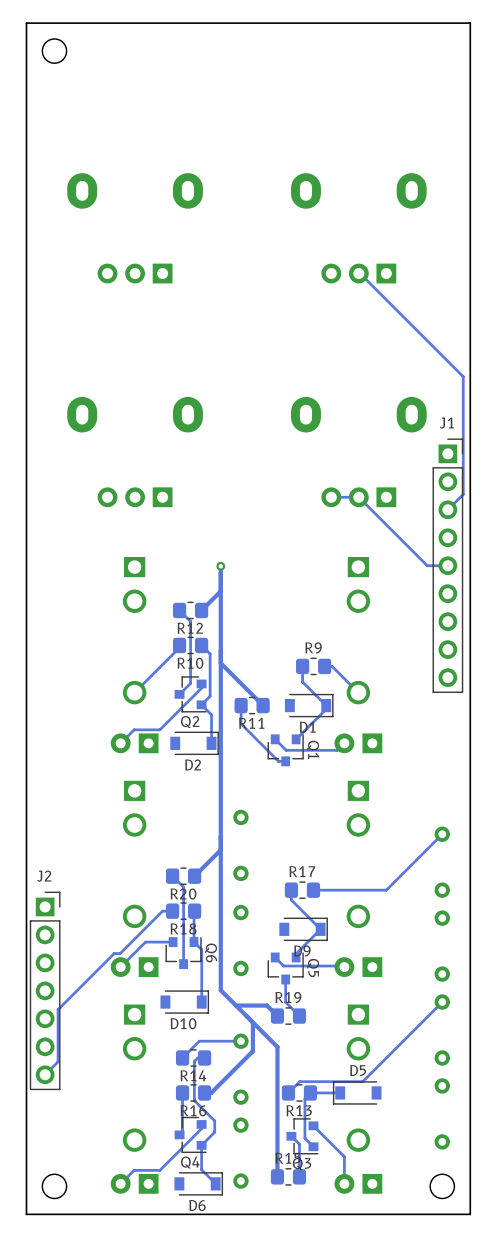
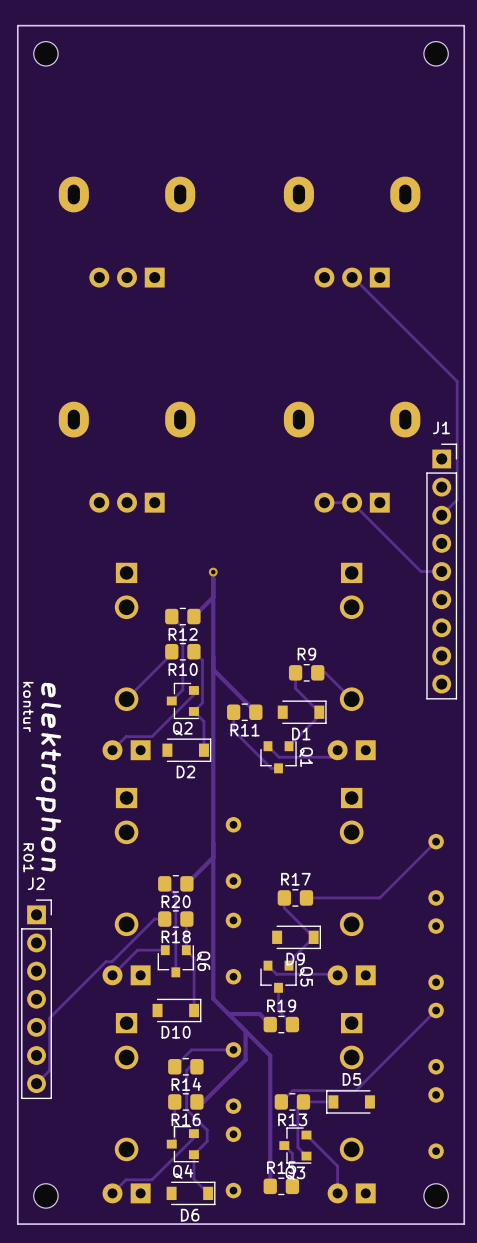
part: none -> (436, 53)
drawing: none -> [23, 681, 62, 873]

